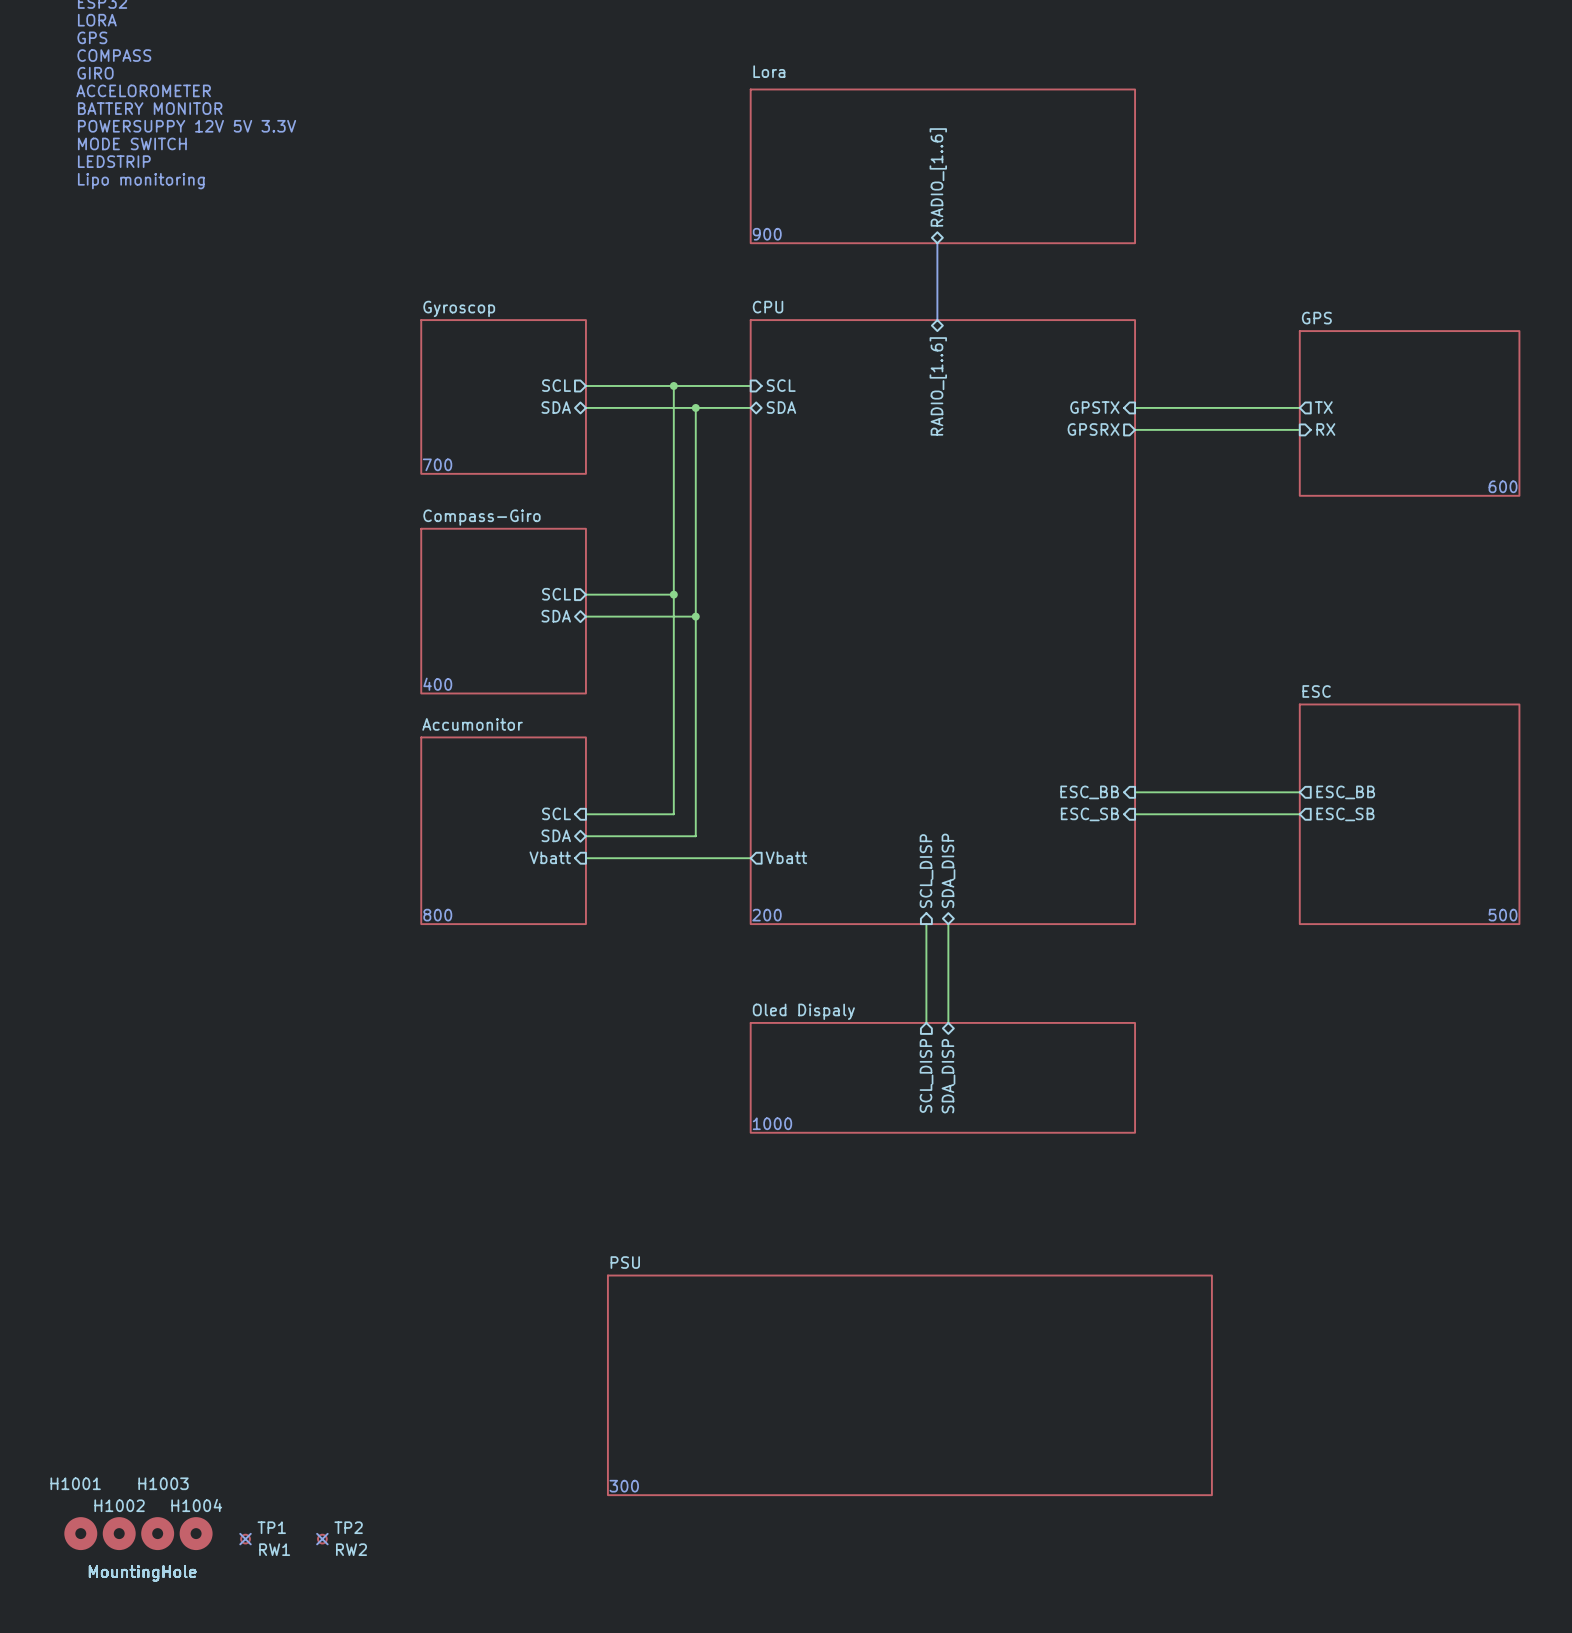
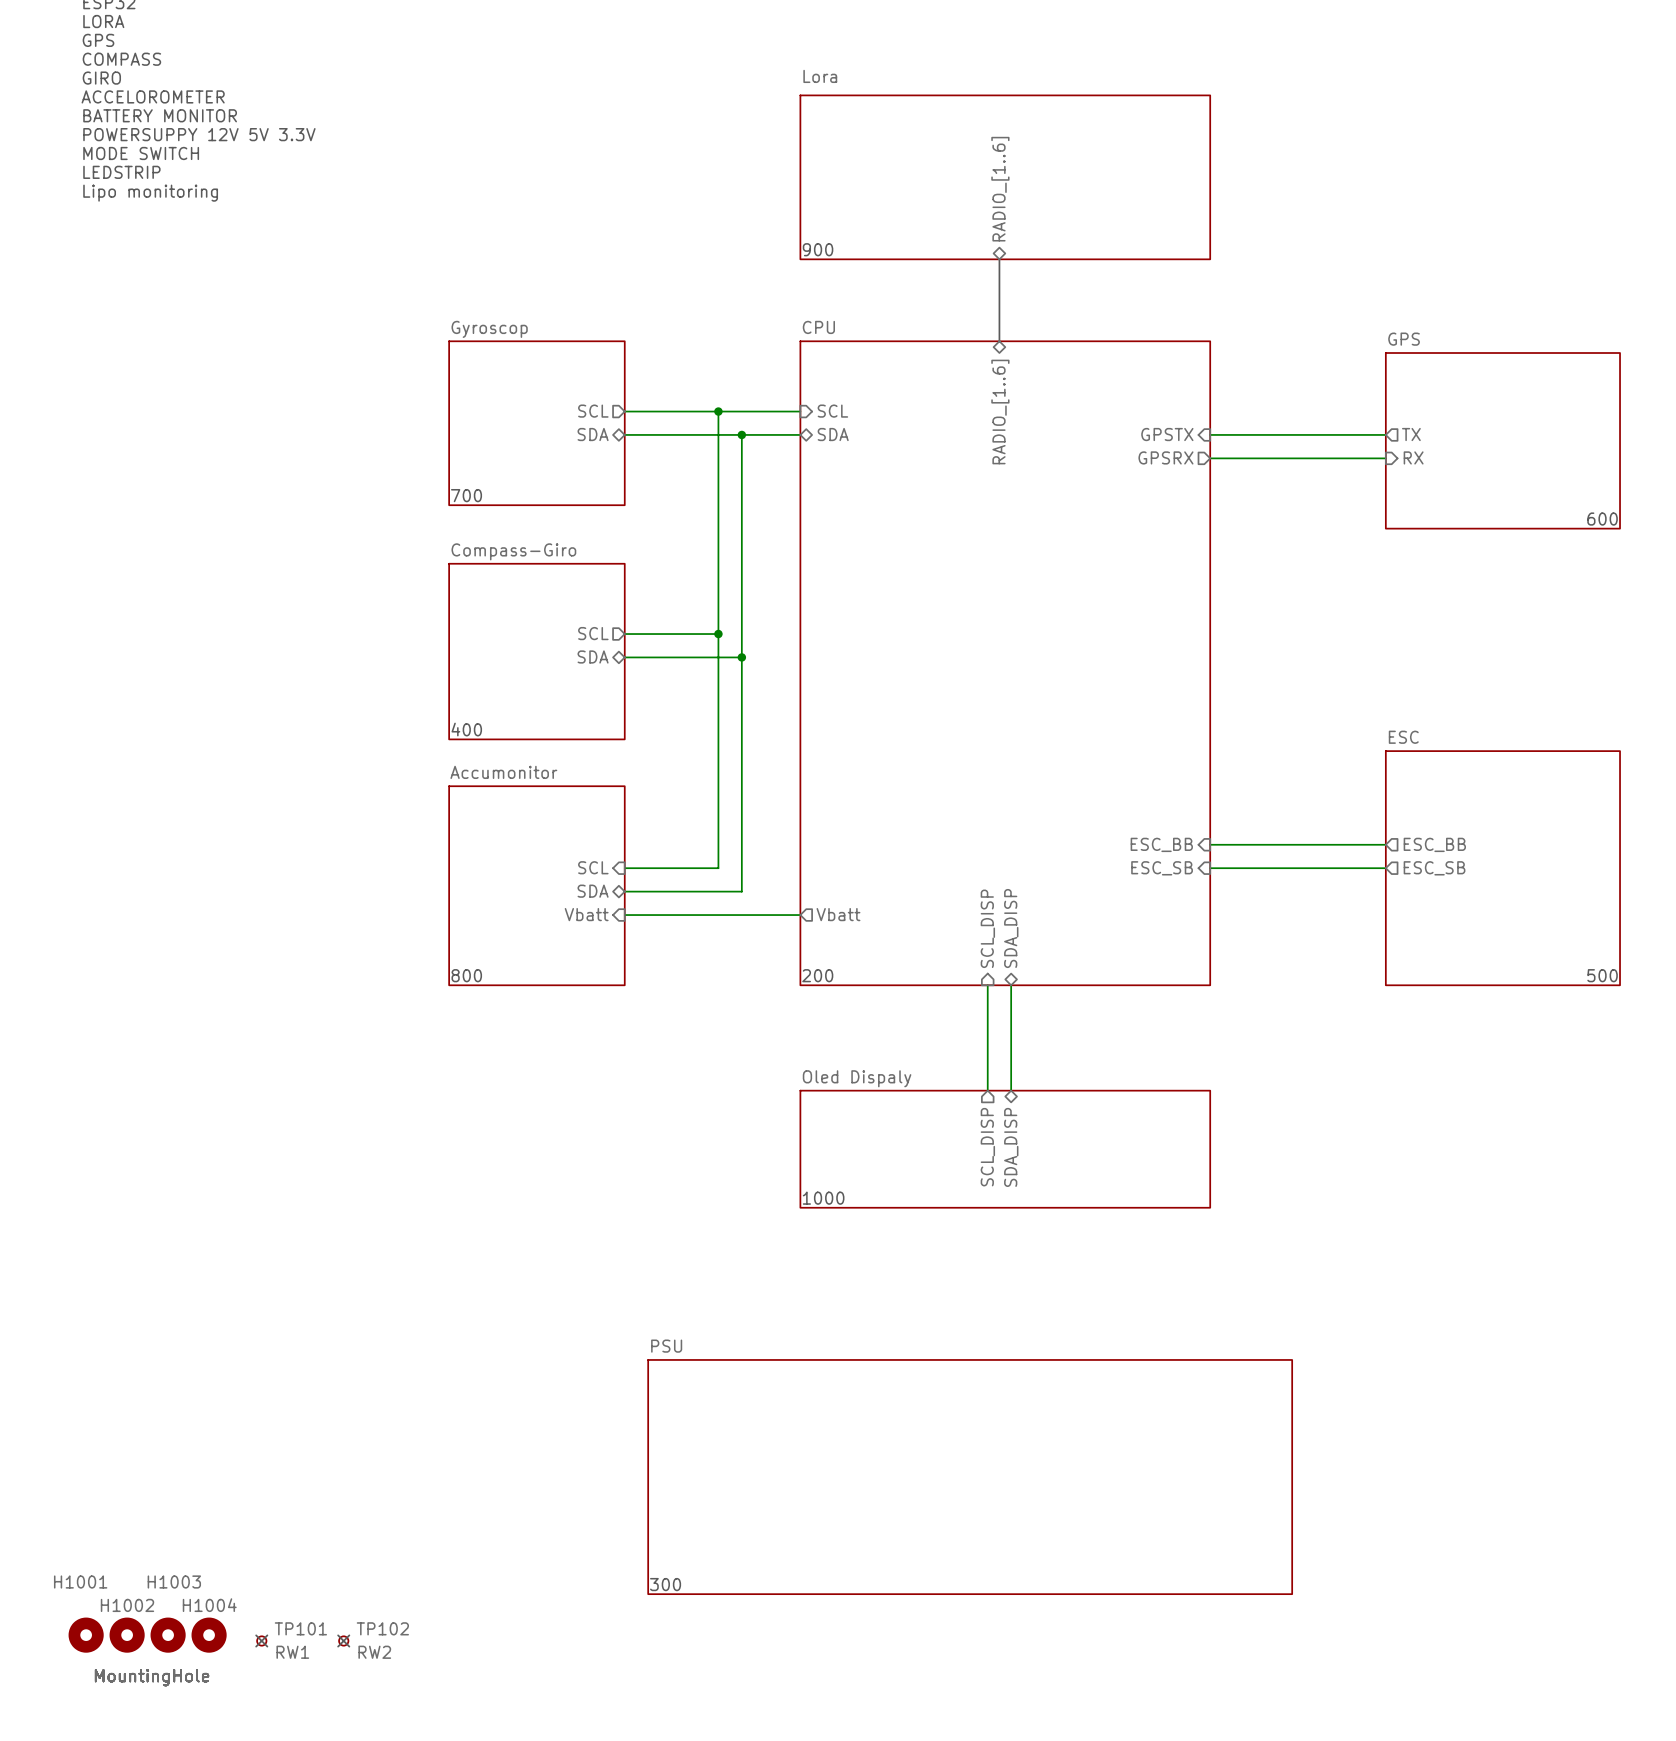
TP1 name: TP1 (271, 1527) -> TP101 (300, 1628)
TP2 name: TP2 (348, 1527) -> TP102 (382, 1628)

